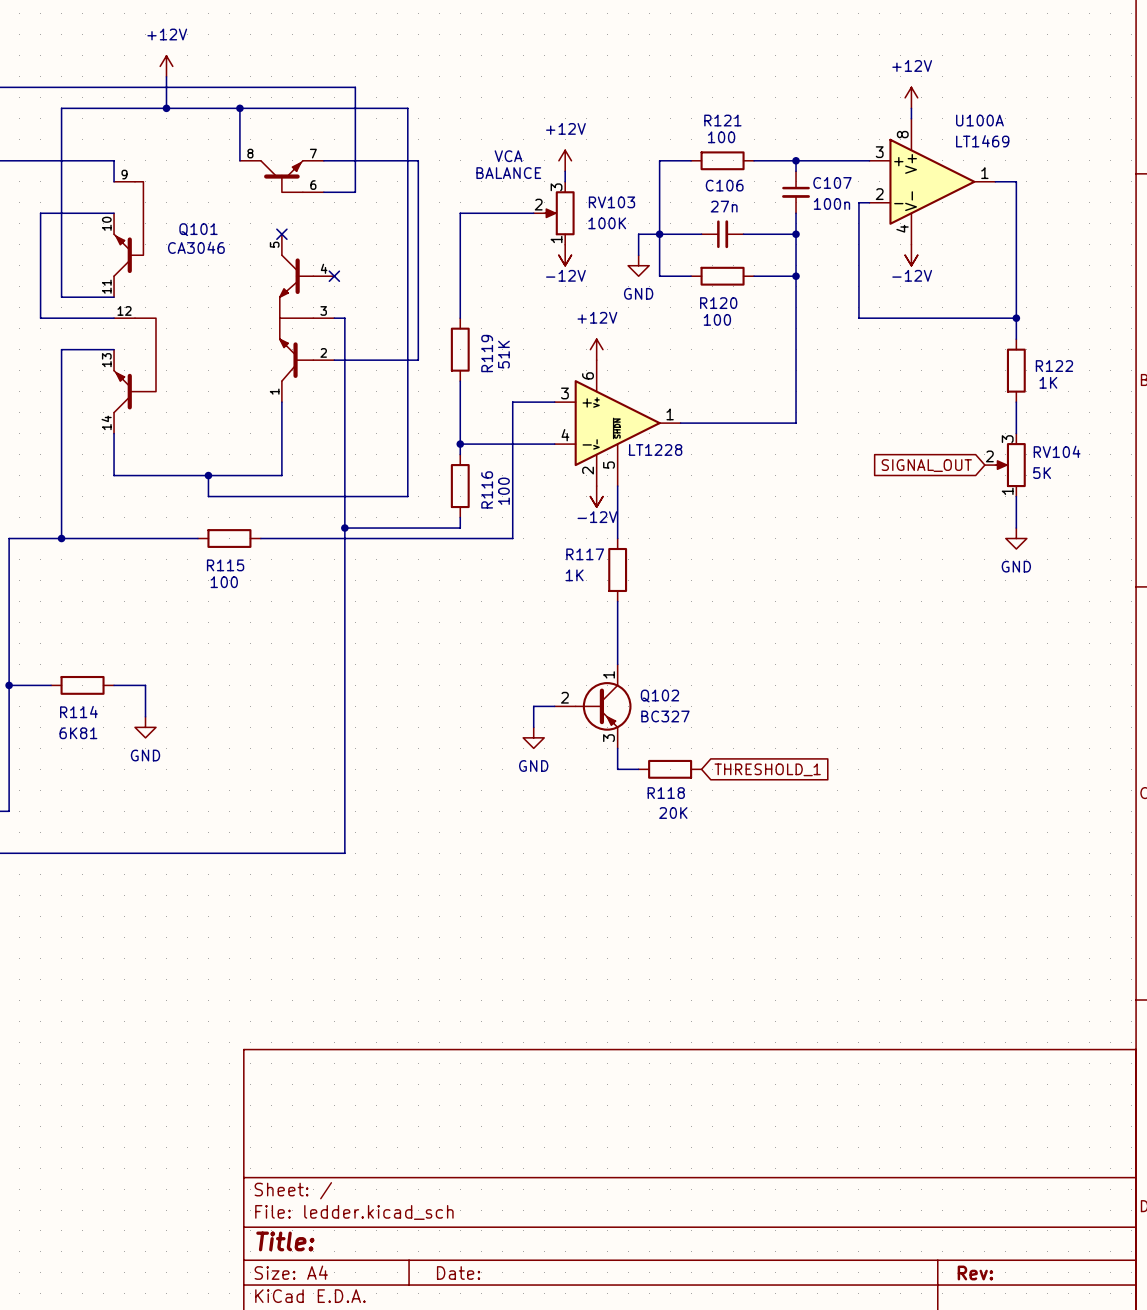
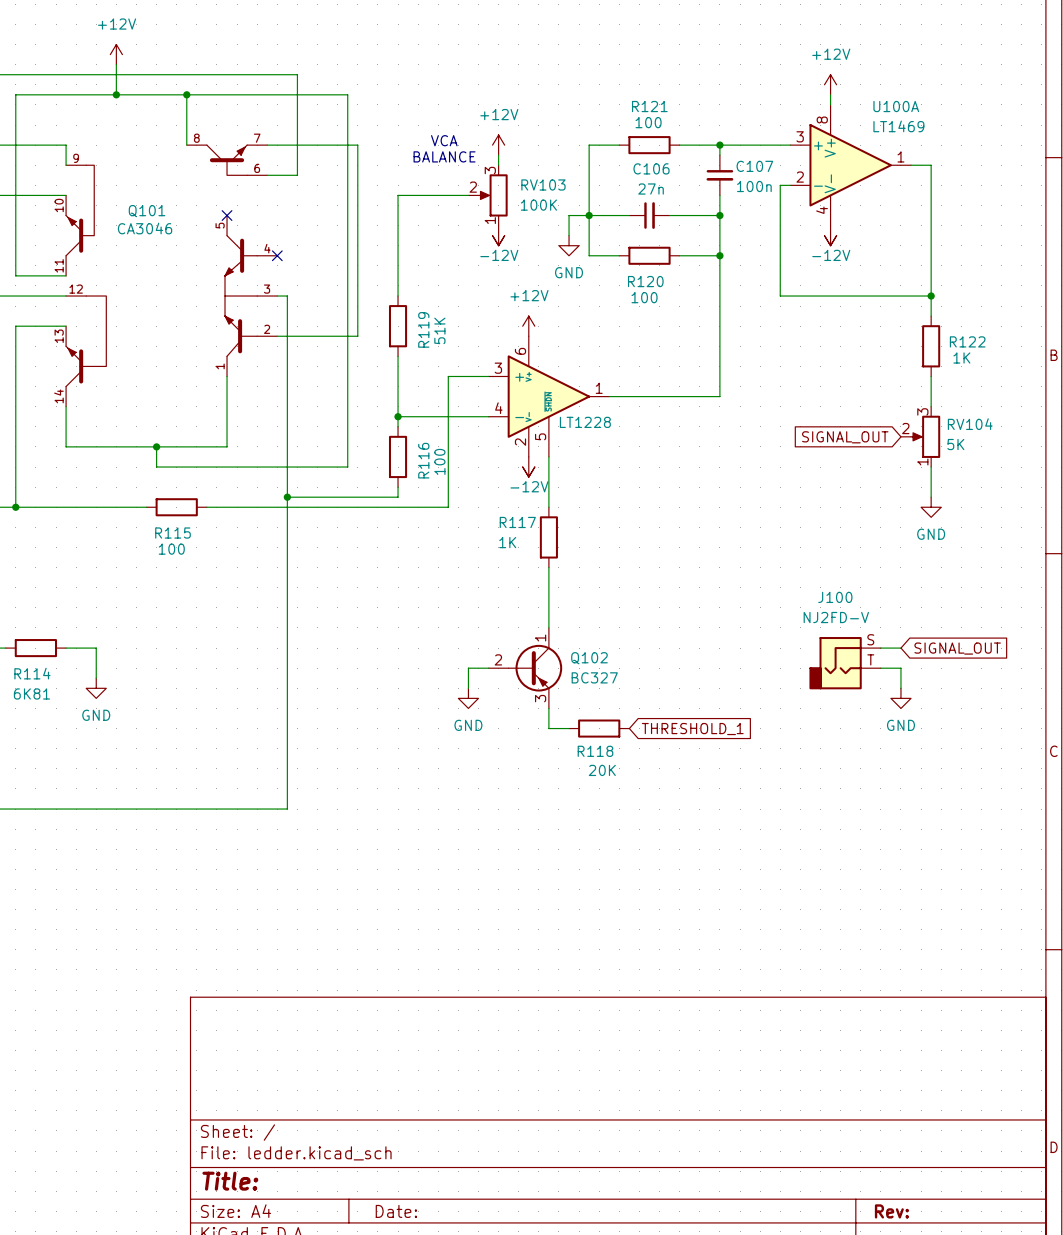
wire: none -> (880, 648) (900, 648)
global label: none -> SIGNAL_OUT (957, 648)
J100: none -> NJ2FD-V (845, 663)
wire: none -> (880, 668) (900, 668) (900, 688)
power symbol: none -> GND (900, 698)

